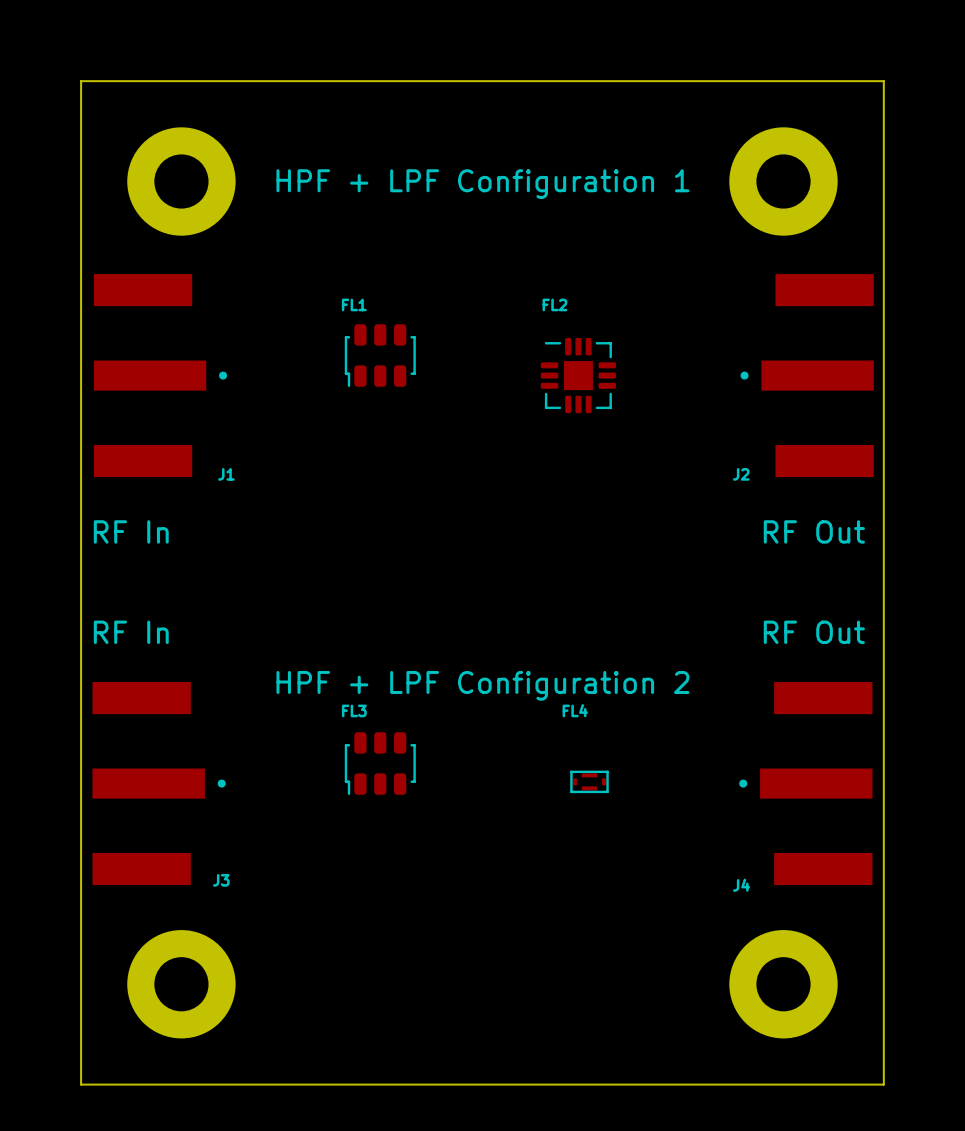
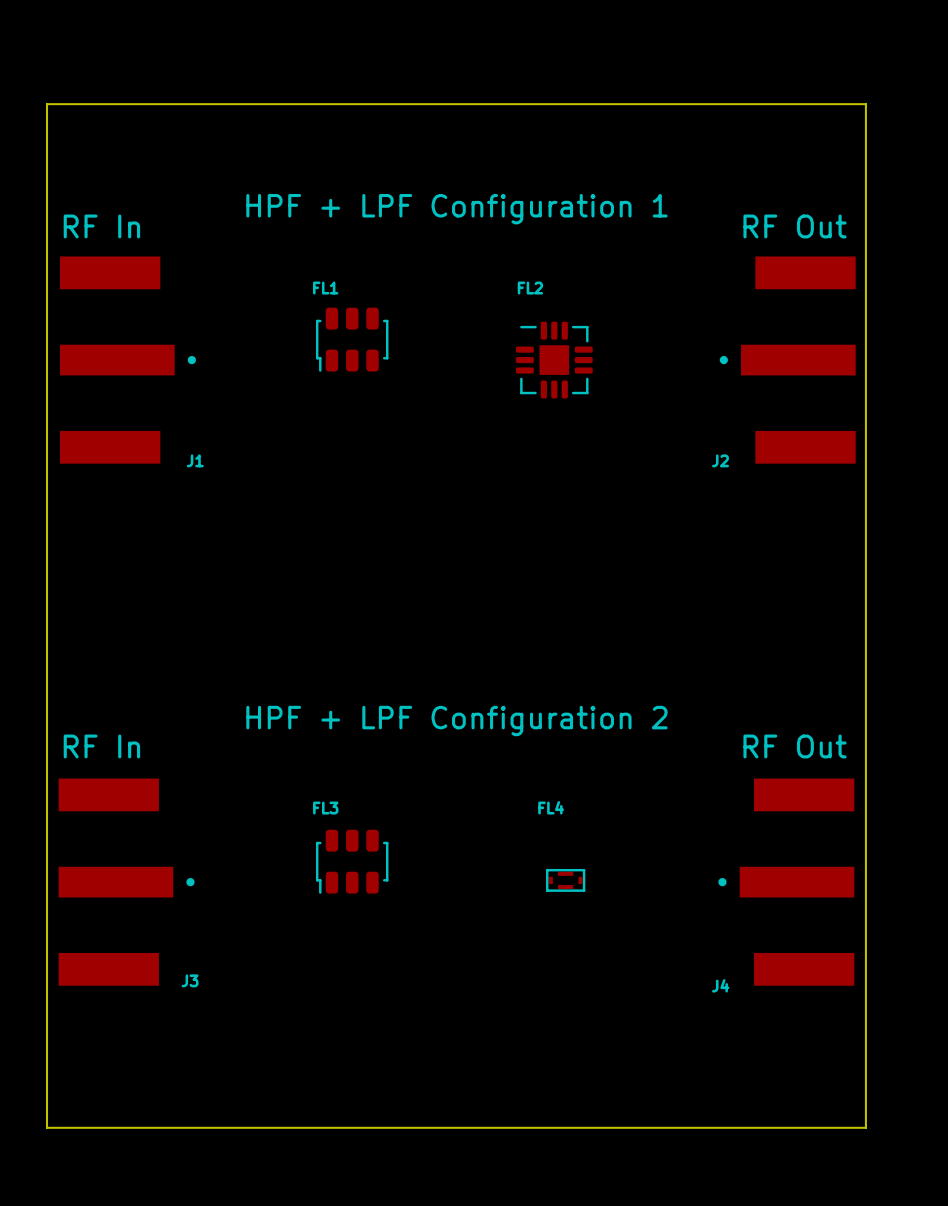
part: (181, 181) -> none
part: (783, 181) -> none
text: none -> RF In (101, 226)
text: none -> RF Out (795, 226)
FL1 position: (380, 355) -> (352, 339)
J1 position: (160, 375) -> (127, 360)
FL2 position: (578, 375) -> (554, 360)
J2 position: (807, 375) -> (787, 360)
text: RF In (131, 531) -> none
text: RF Out (814, 531) -> none
text position: RF In (131, 632) -> RF In (101, 746)
text position: RF Out (814, 632) -> RF Out (795, 746)
FL3 position: (380, 763) -> (352, 861)
J3 position: (159, 783) -> (126, 882)
FL4 position: (589, 783) -> (565, 882)
J4 position: (805, 783) -> (786, 882)
part: (181, 984) -> none
part: (783, 984) -> none

